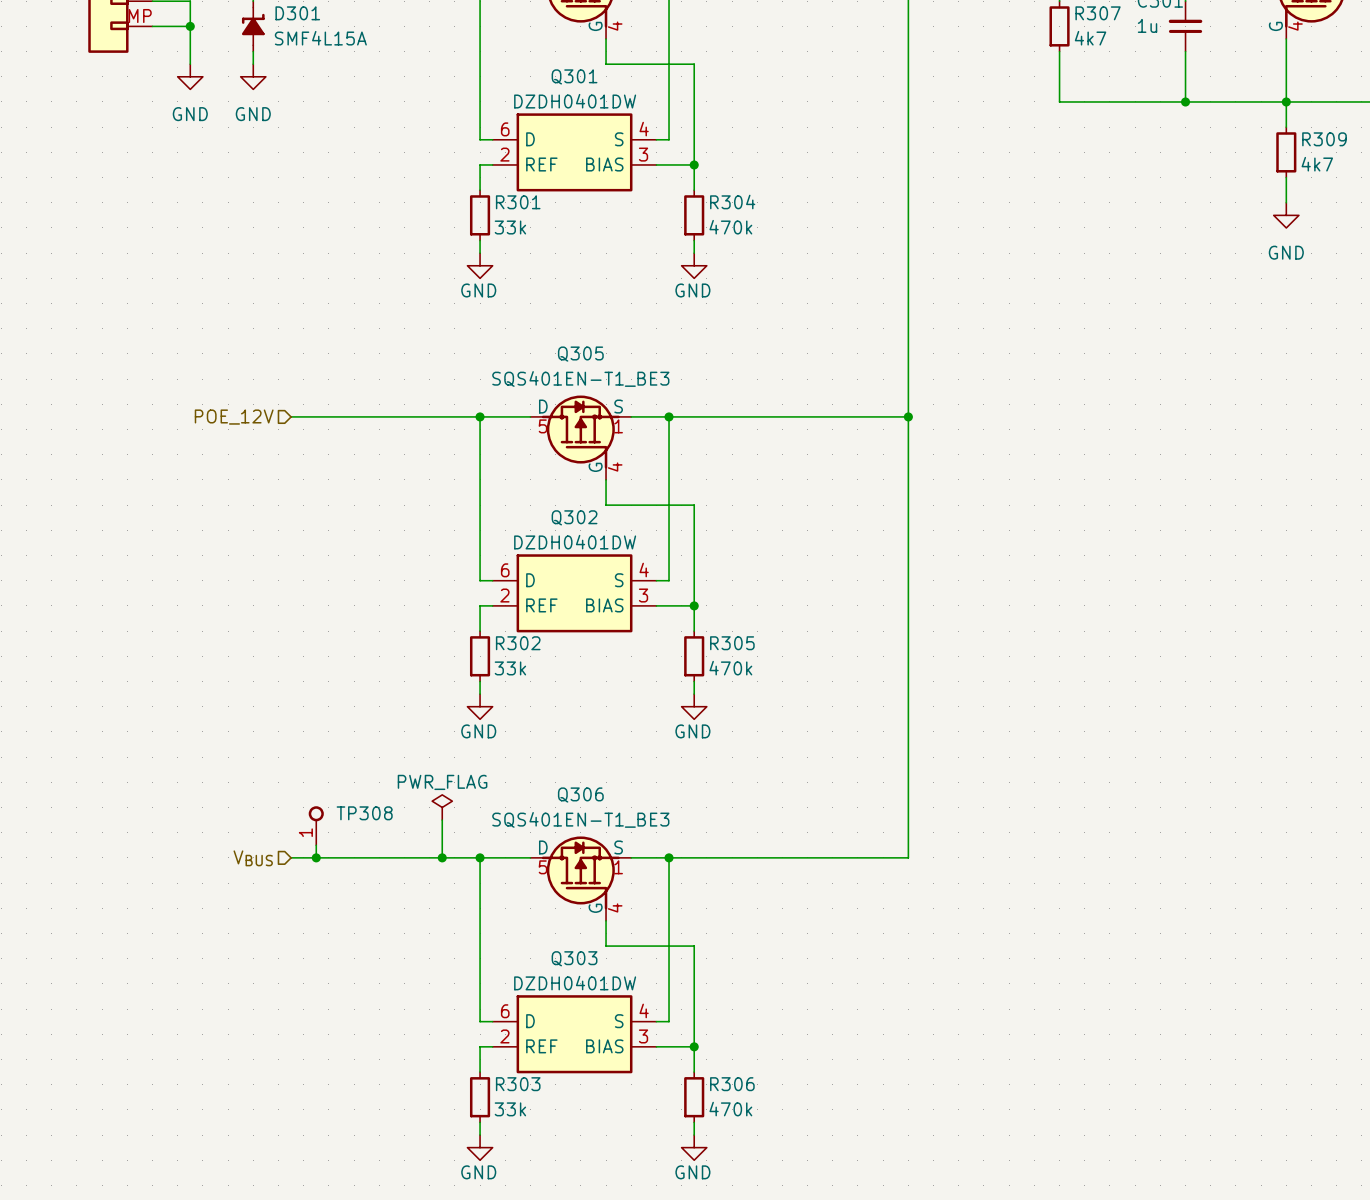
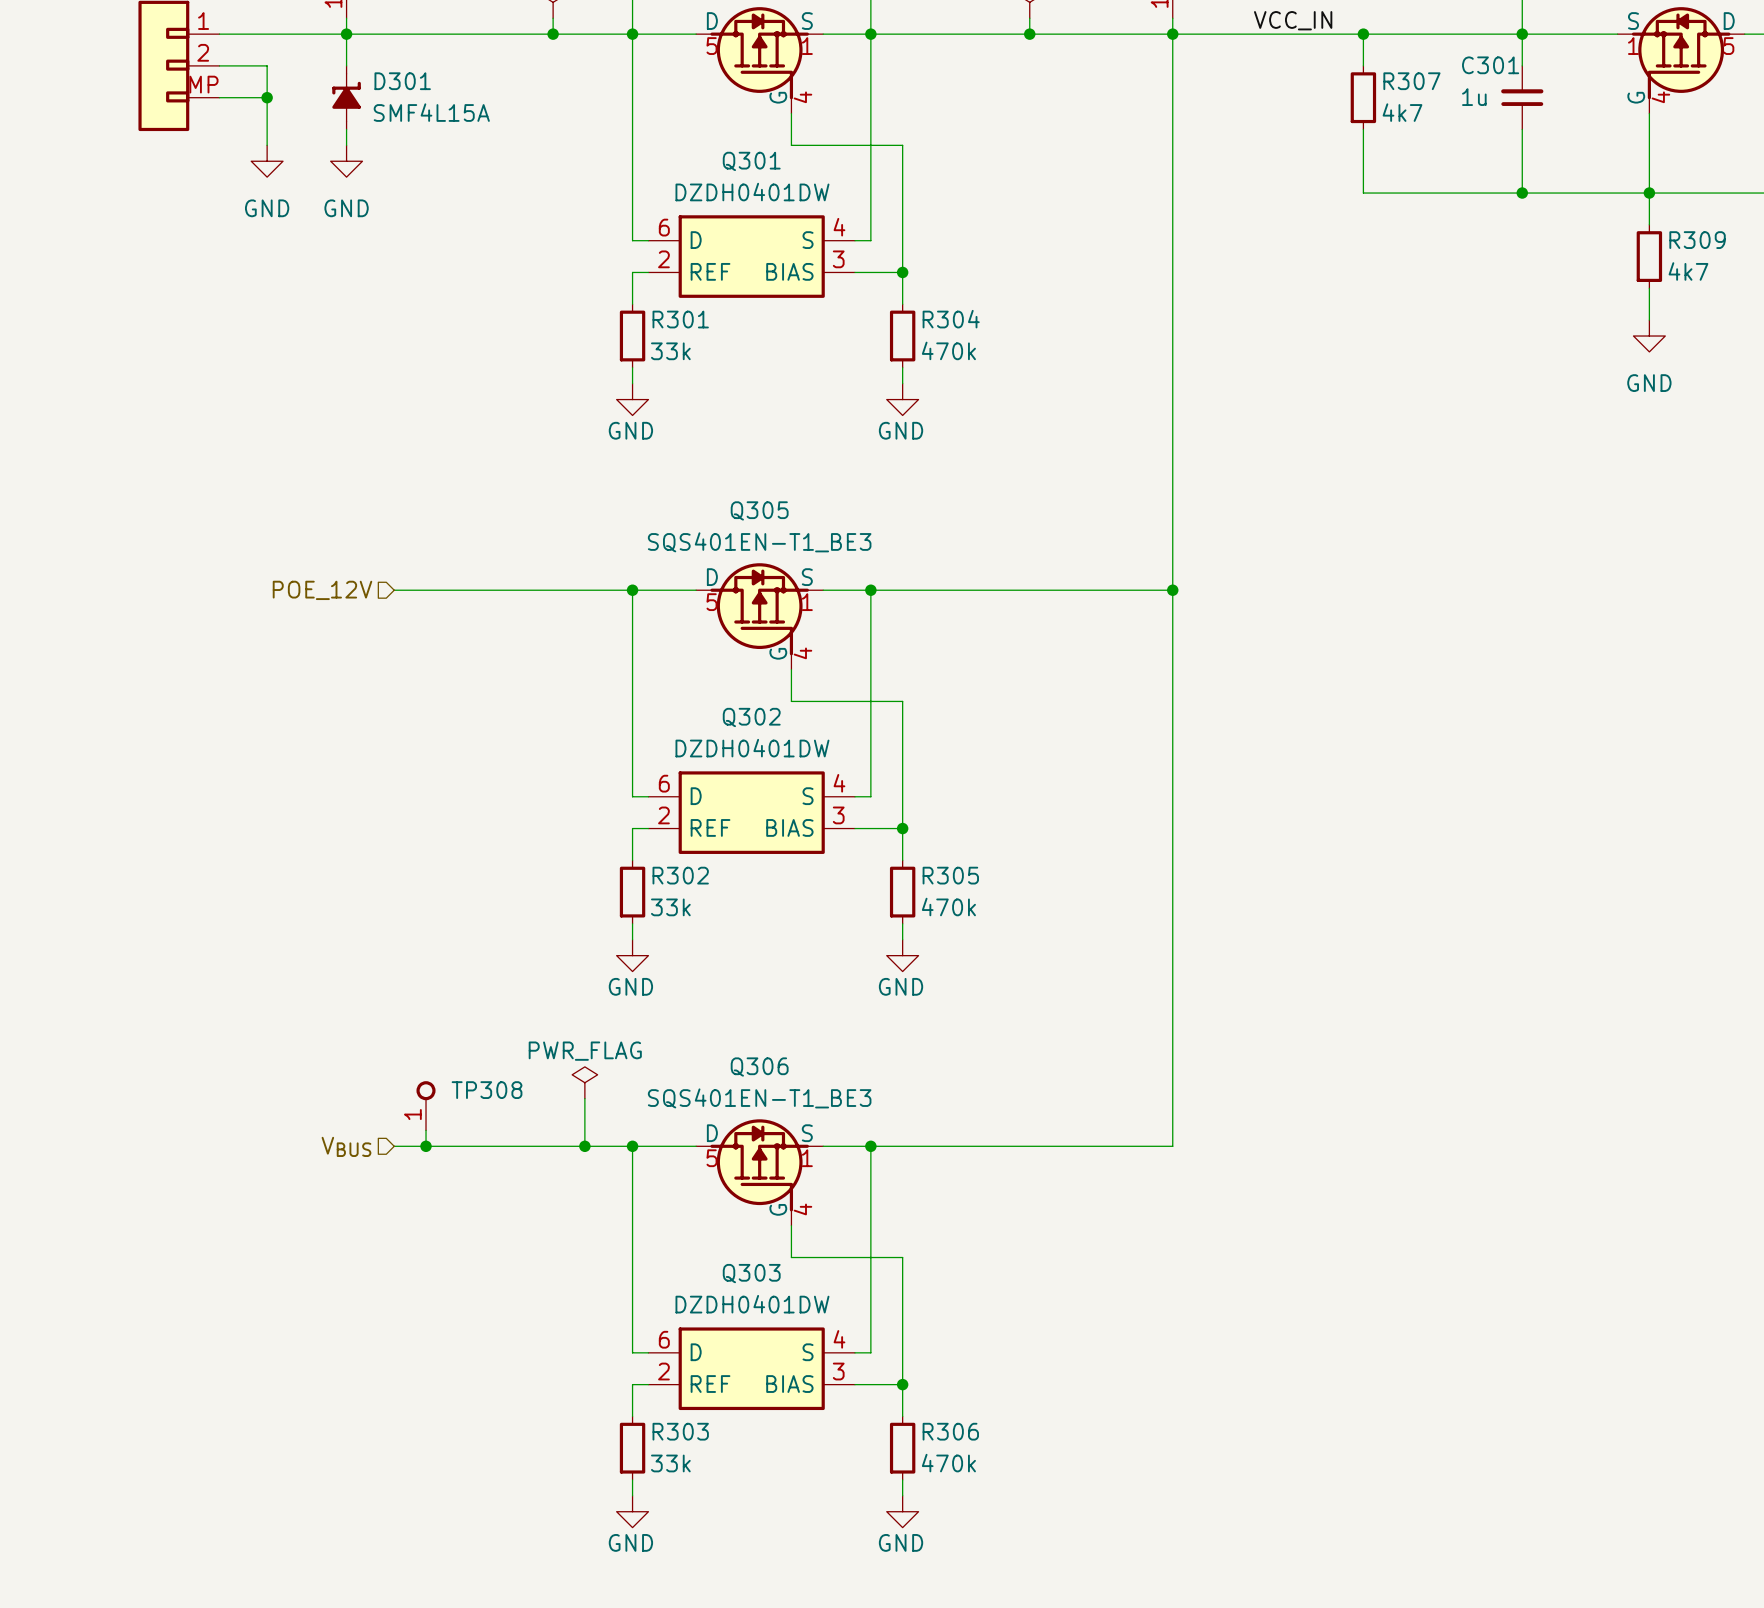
Q301 symbol: [492, 113, 657, 192] -> [648, 215, 855, 298]
Q302 symbol: [492, 554, 657, 633] -> [648, 771, 855, 854]
Q303 symbol: [492, 995, 657, 1074] -> [648, 1327, 855, 1411]

